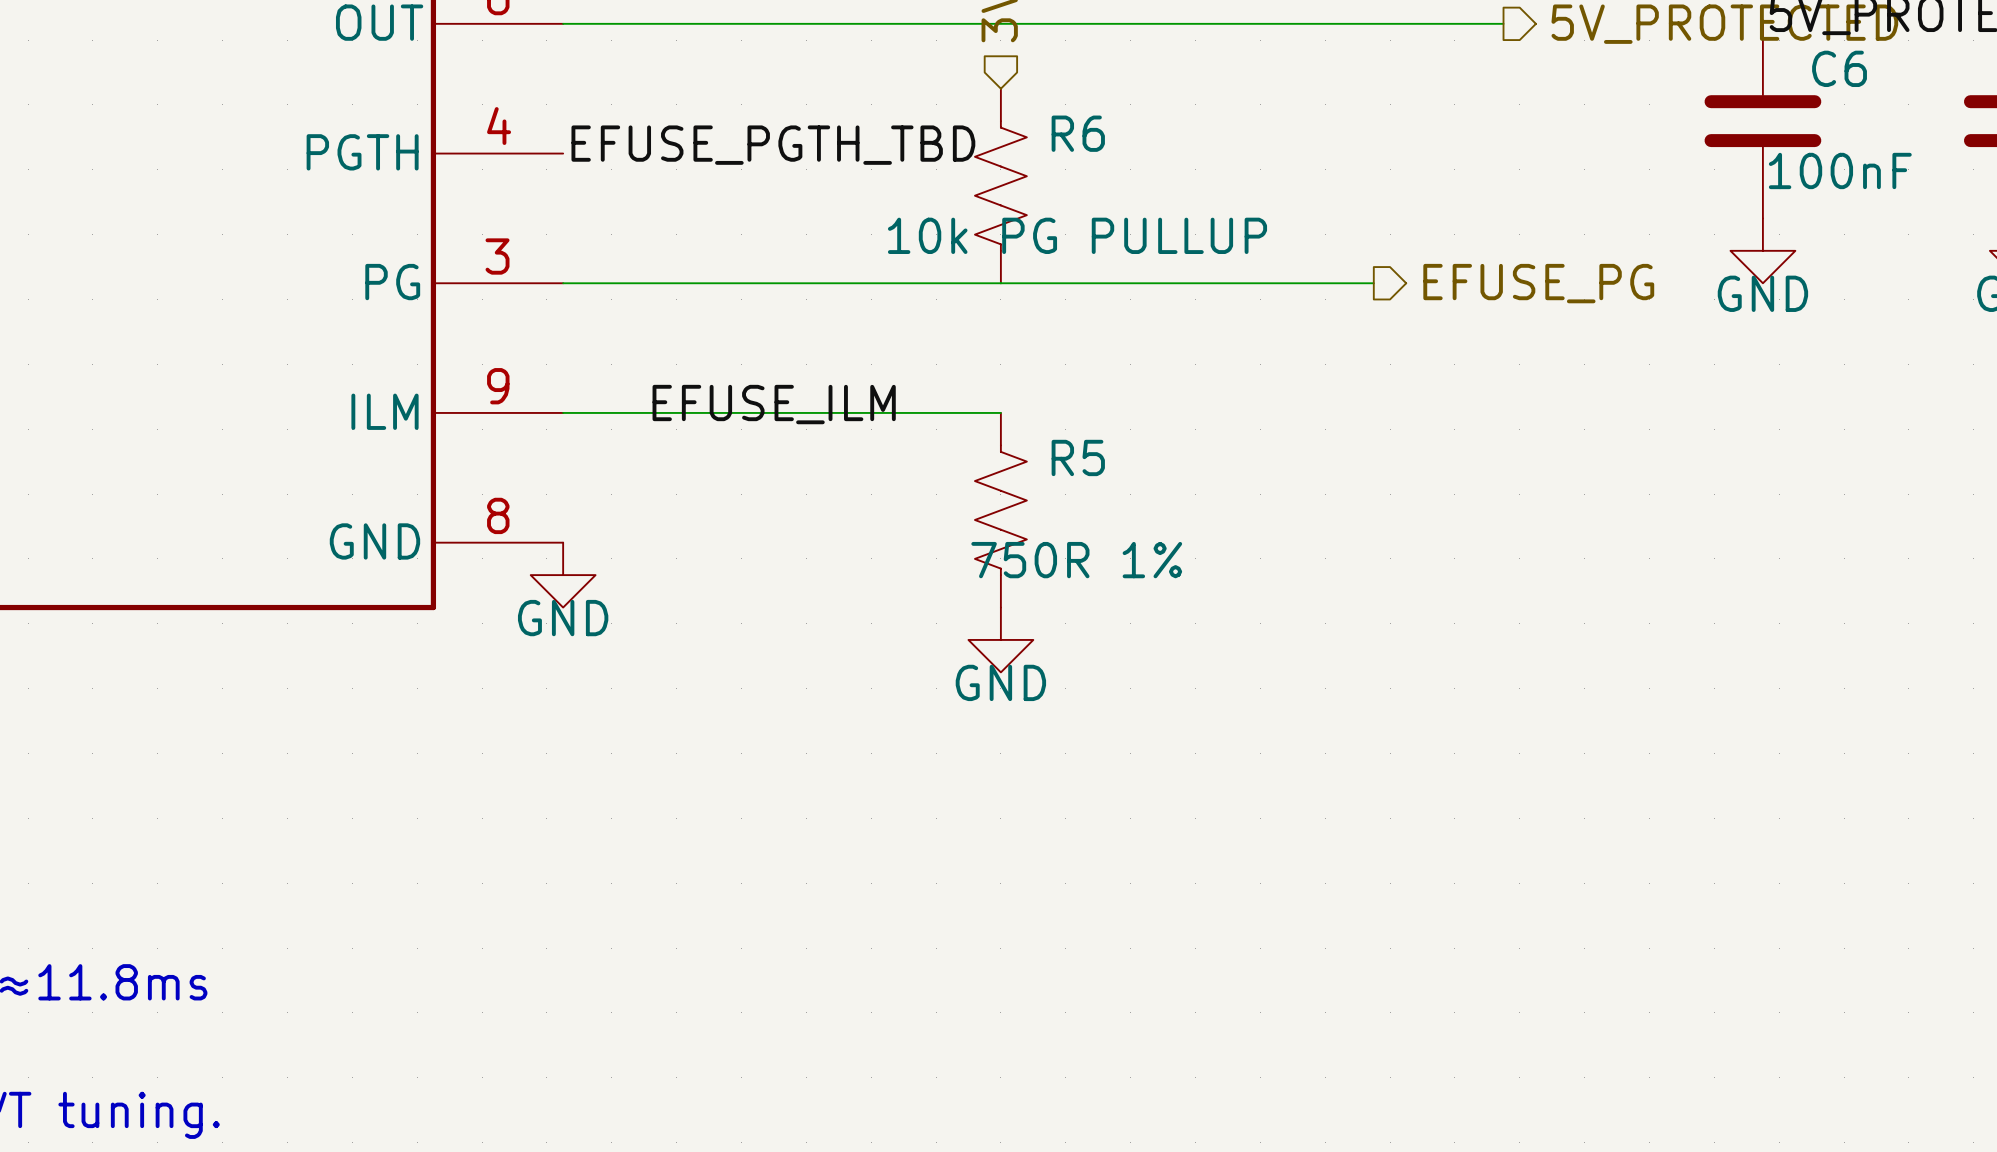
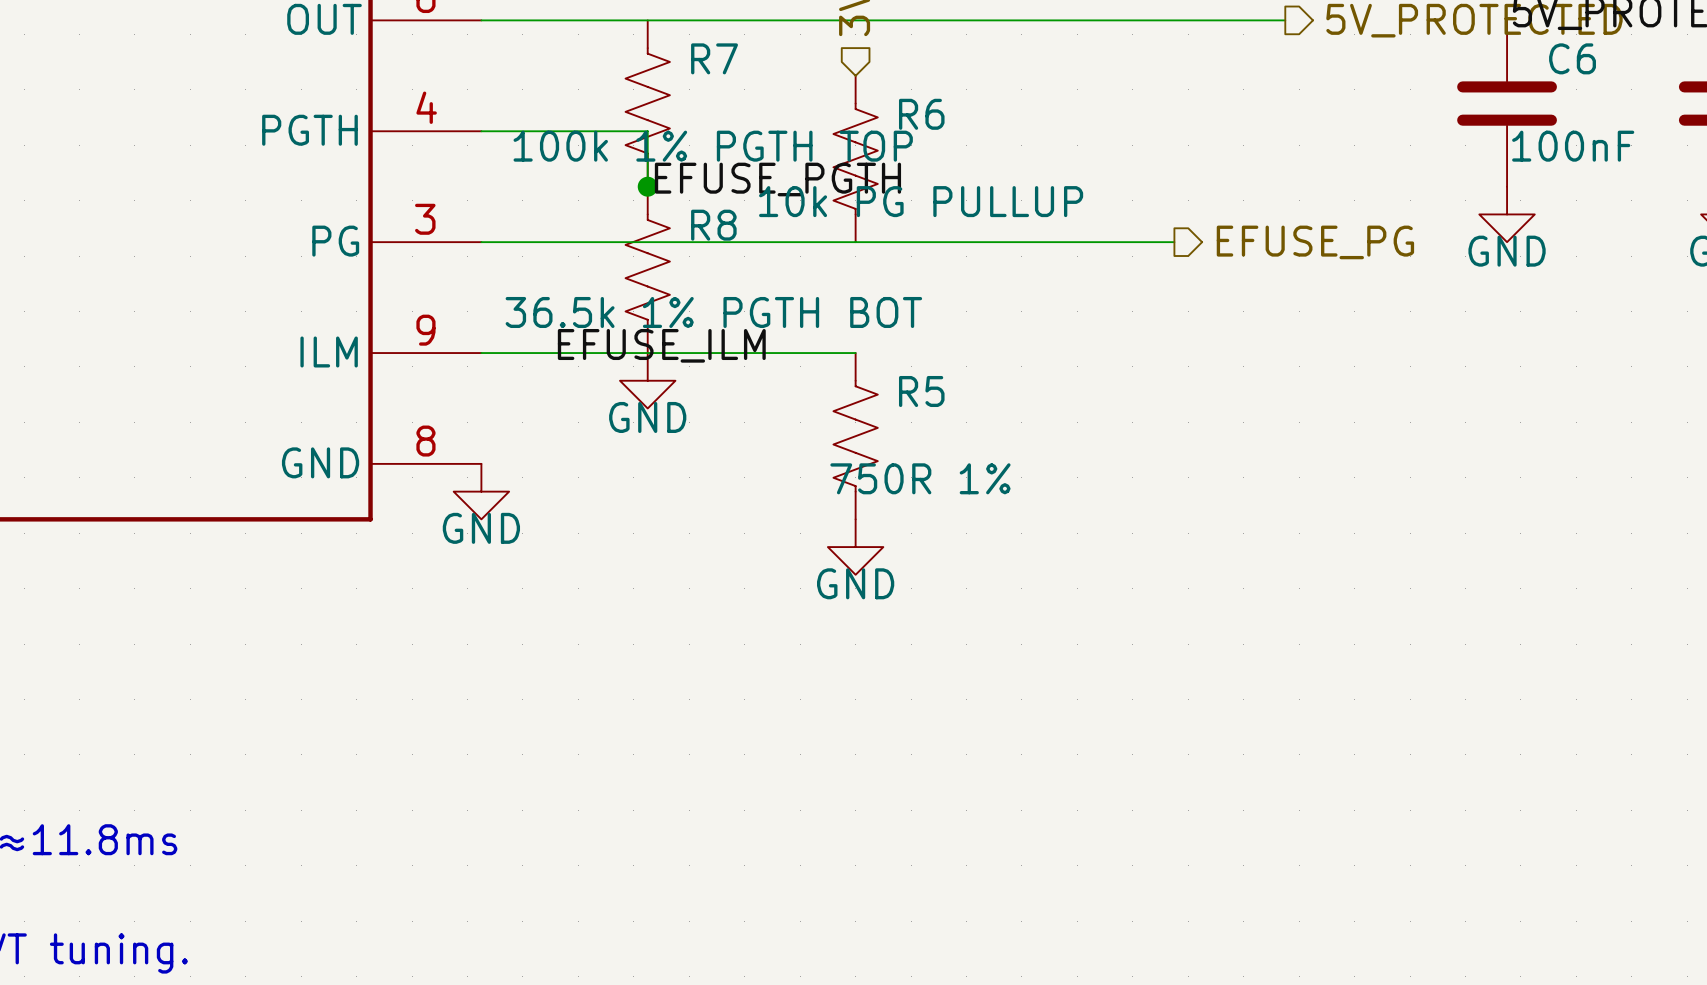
R7: none -> 100k 1% PGTH TOP (647, 103)
label: EFUSE_PGTH_TBD (773, 145) -> EFUSE_PGTH (777, 179)
wire: none -> (481, 131) (647, 131) (647, 186)
junction: none -> (647, 186)
R8: none -> 36.5k 1% PGTH BOT (647, 269)
power symbol: none -> GND (647, 380)

